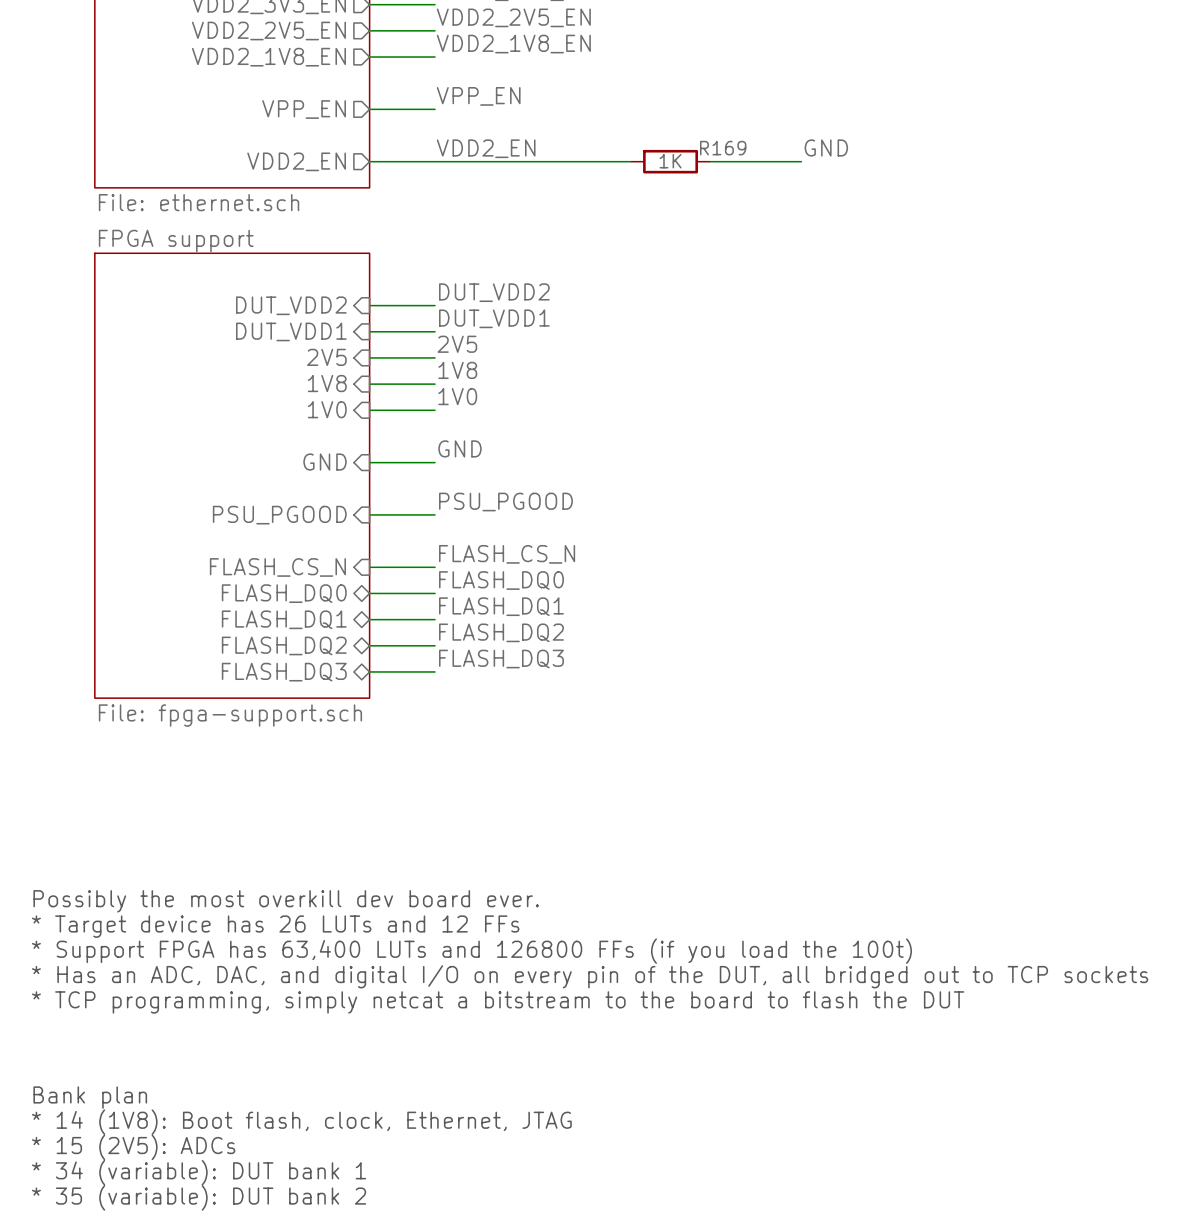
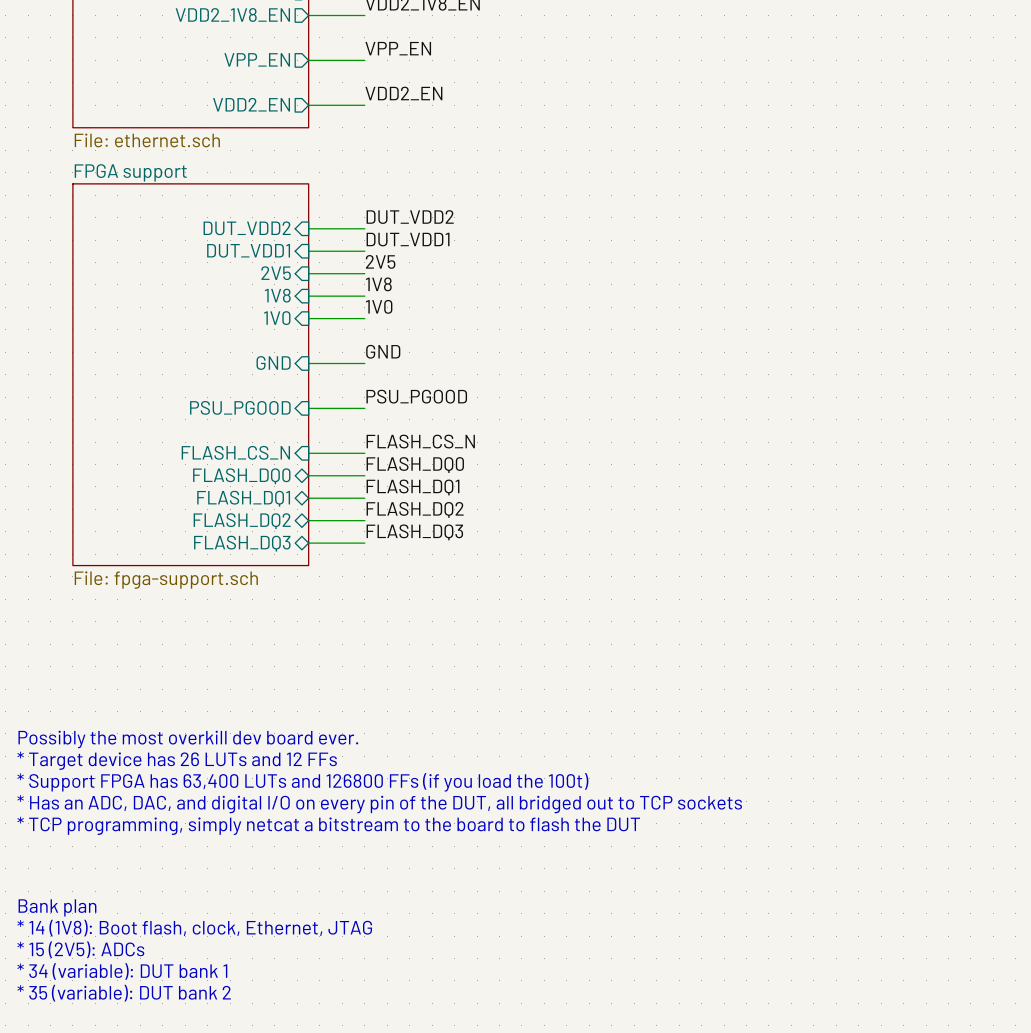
label: GND (826, 147) -> none
wire: (435, 161) (631, 161) -> none
R169: 1K (670, 161) -> none
wire: (709, 161) (801, 161) -> none

